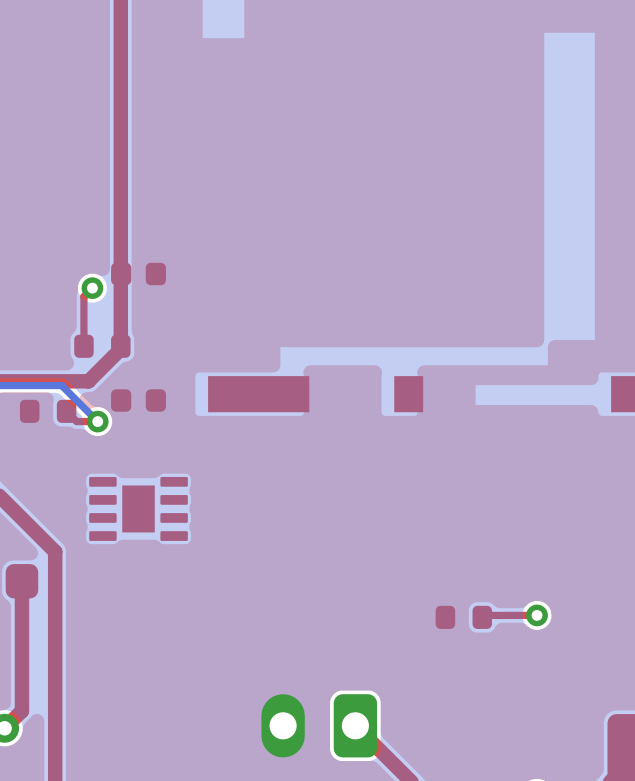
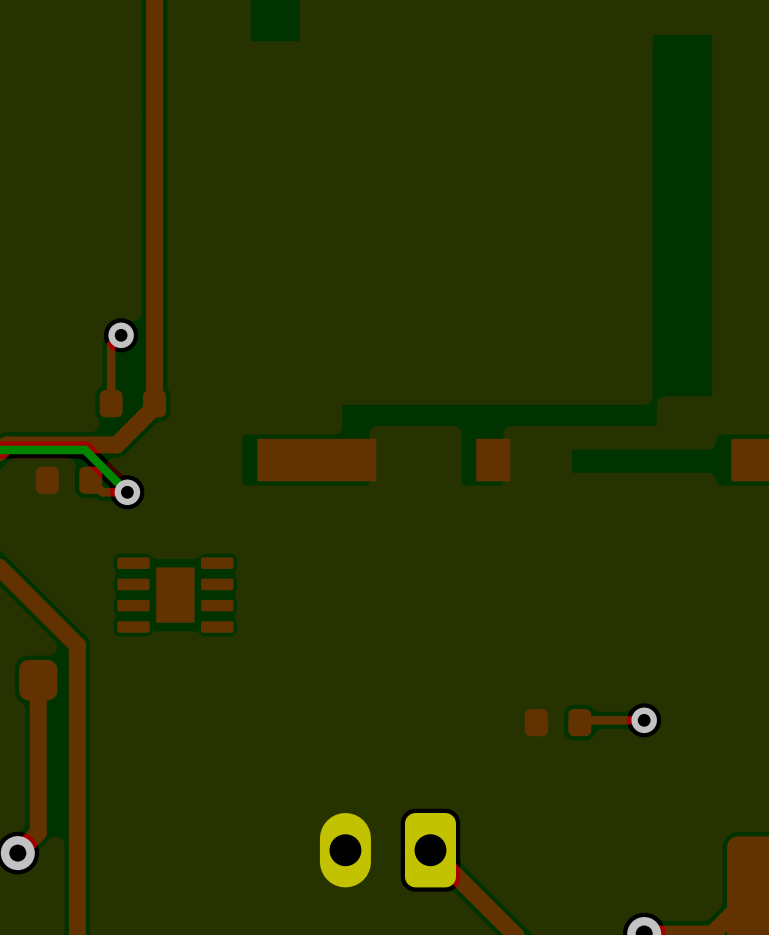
part: (138, 274) -> none
part: (138, 400) -> none

